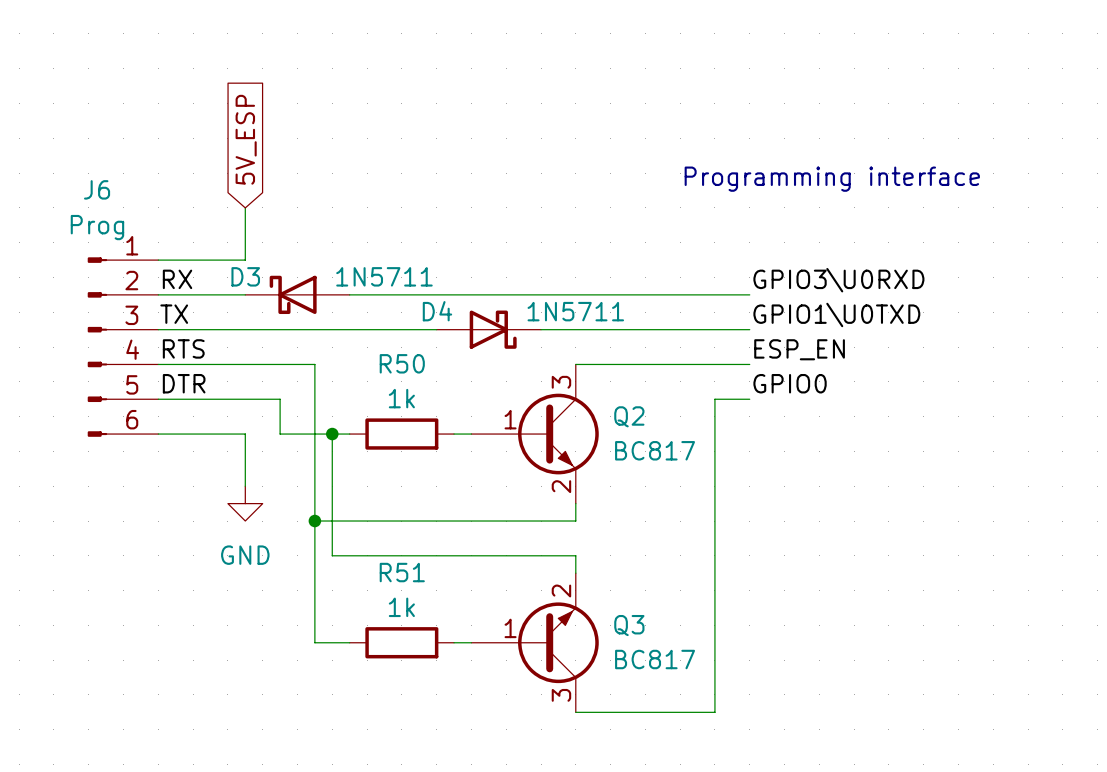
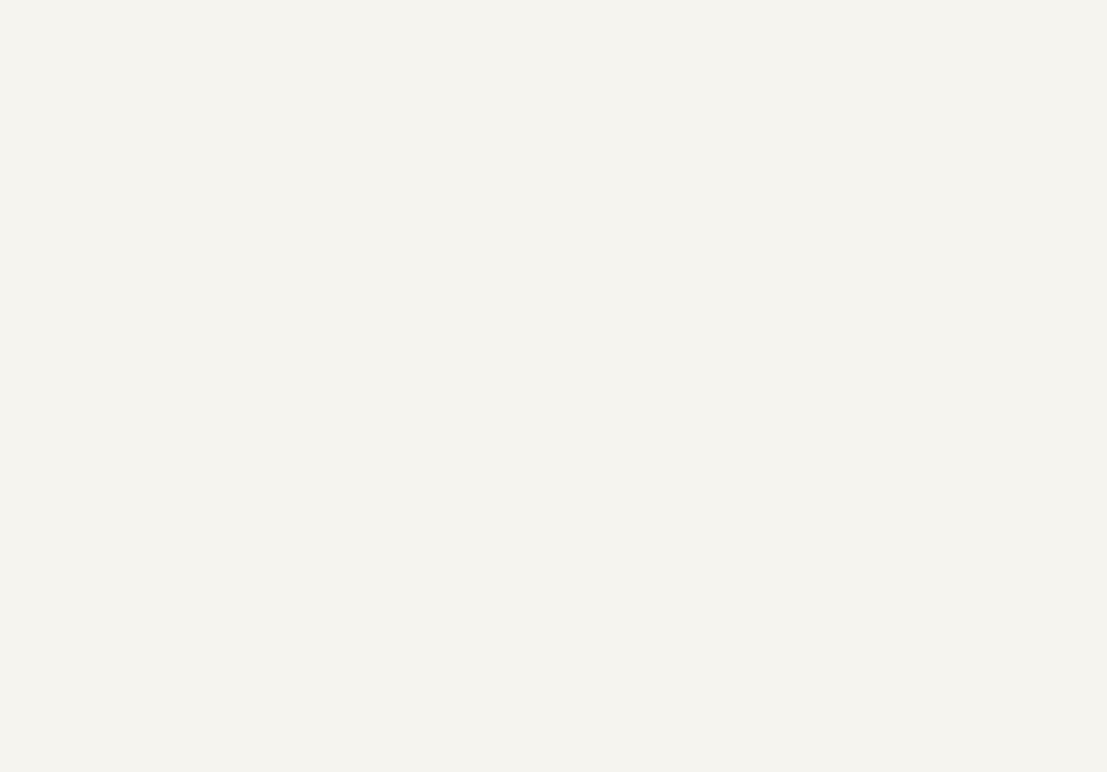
global label: 5V_ESP (246, 139) -> none
text: Programming interface (832, 179) -> none
wire: (245, 207) (245, 260) (158, 260) -> none
label: RX (177, 279) -> none
label: GPIO3\U0RXD (838, 280) -> none
wire: (158, 294) (245, 294) -> none
D3: 1N5711 (297, 294) -> none
wire: (349, 294) (749, 294) -> none
label: TX (174, 314) -> none
label: GPIO1\U0TXD (836, 314) -> none
wire: (158, 329) (436, 329) -> none
D4: 1N5711 (488, 329) -> none
wire: (541, 329) (749, 329) -> none
J6: Prog (123, 347) -> none
label: RTS (183, 348) -> none
label: ESP_EN (799, 349) -> none
wire: (158, 364) (314, 364) (314, 642) (349, 642) -> none
wire: (575, 364) (749, 364) -> none
label: DTR (184, 383) -> none
label: GPIO0 (790, 383) -> none
wire: (158, 399) (280, 399) (280, 434) (349, 434) -> none
wire: (749, 399) (714, 399) (714, 712) (575, 712) -> none
wire: (158, 434) (245, 434) (245, 486) -> none
wire: (332, 434) (332, 555) (575, 555) (575, 573) -> none
junction: (332, 434) -> none
R50: 1k (401, 434) -> none
wire: (454, 434) (471, 434) -> none
Q2: BC817 (535, 434) -> none
power symbol: GND (245, 503) -> none
wire: (575, 503) (575, 521) (314, 521) -> none
junction: (314, 521) -> none
R51: 1k (401, 642) -> none
wire: (454, 642) (471, 642) -> none
Q3: BC817 (535, 642) -> none

